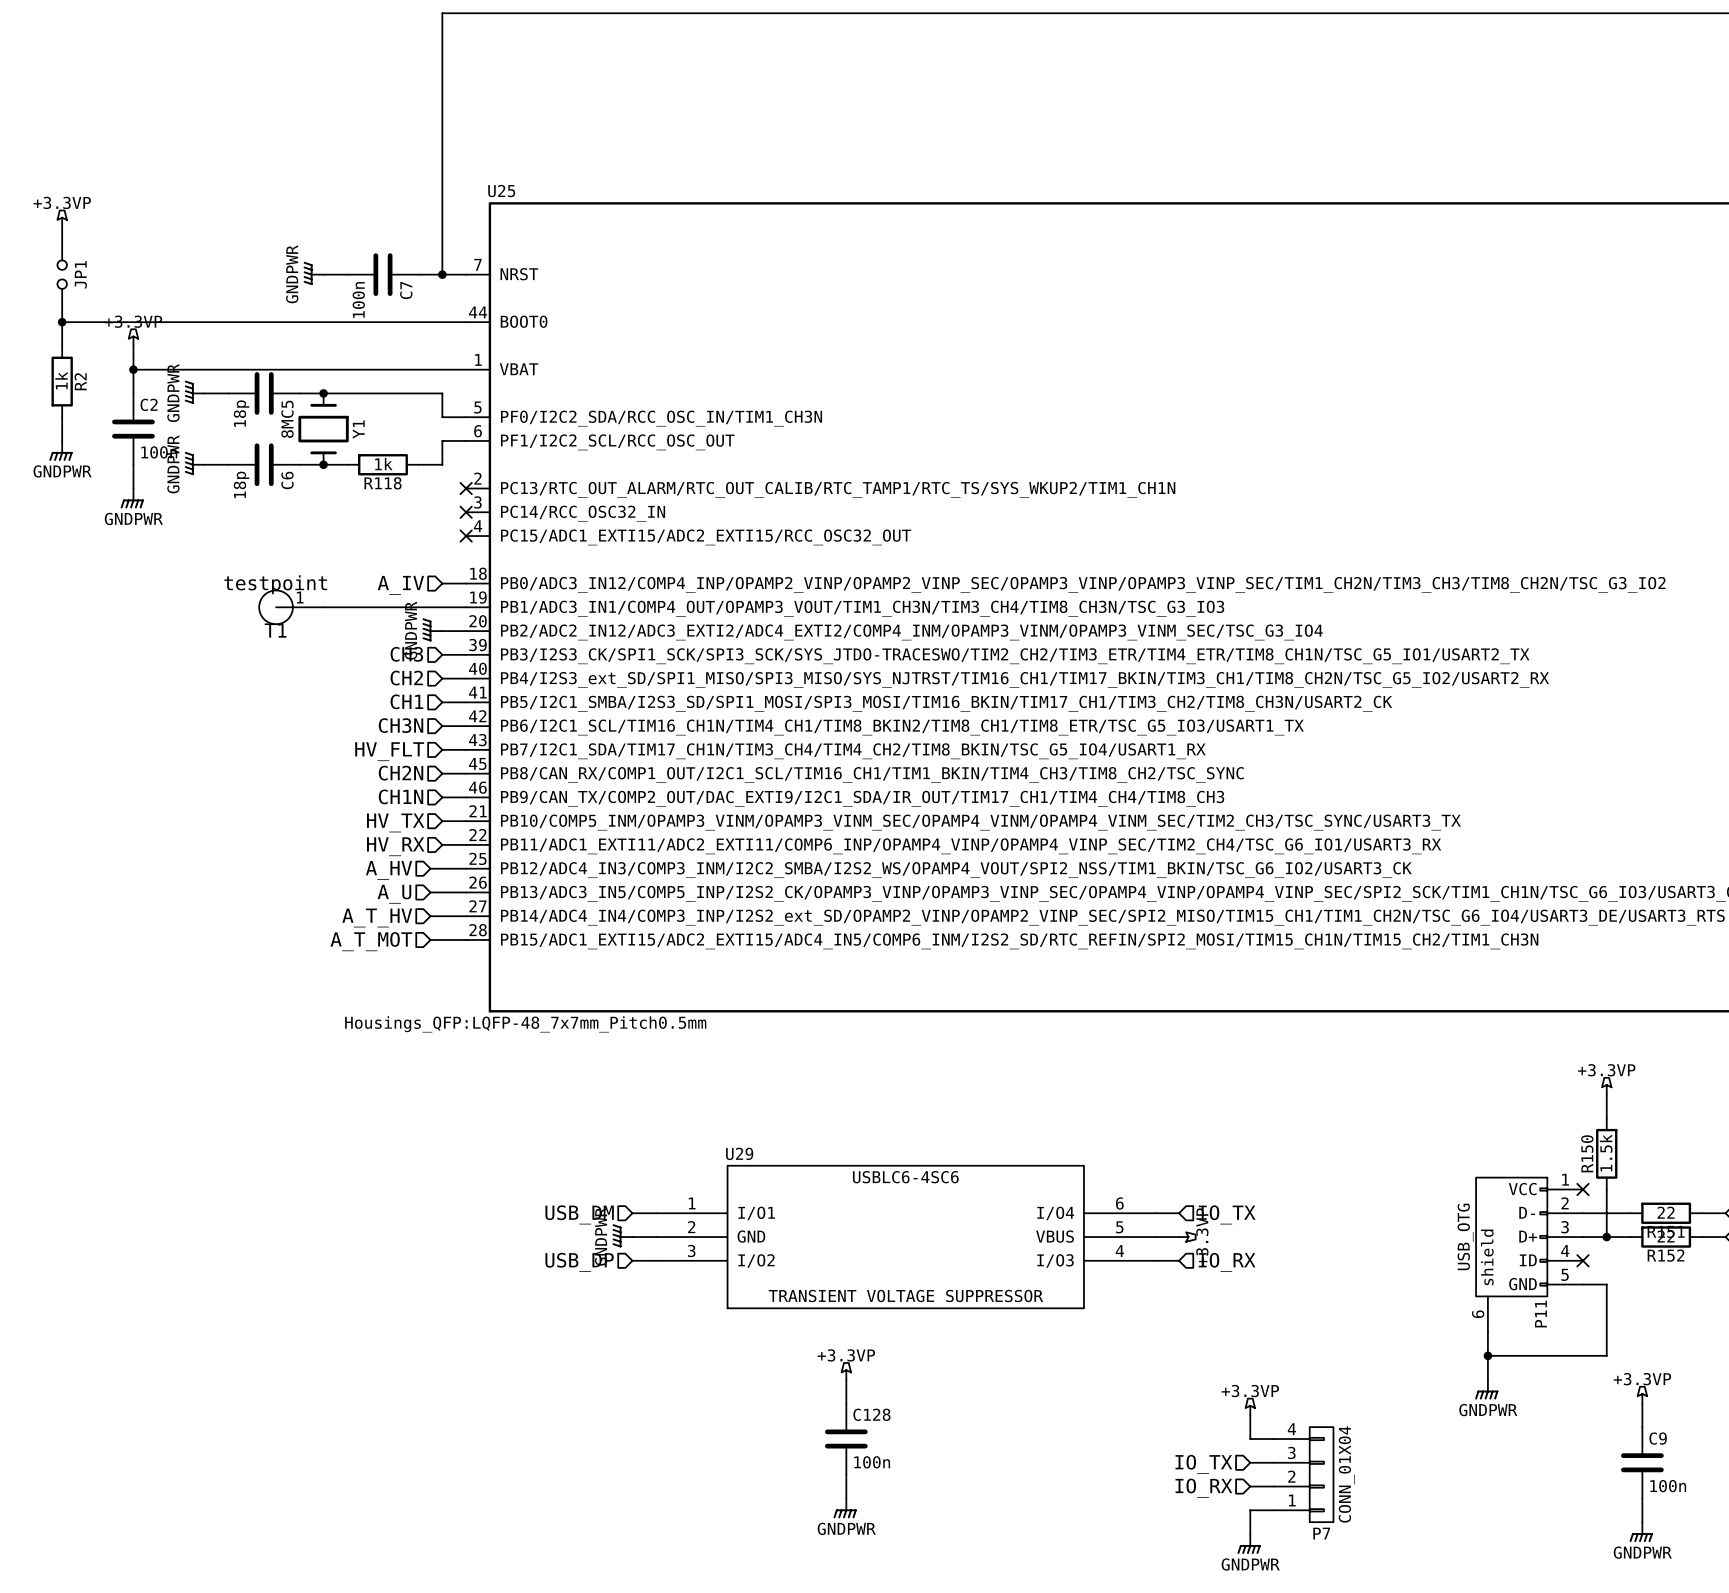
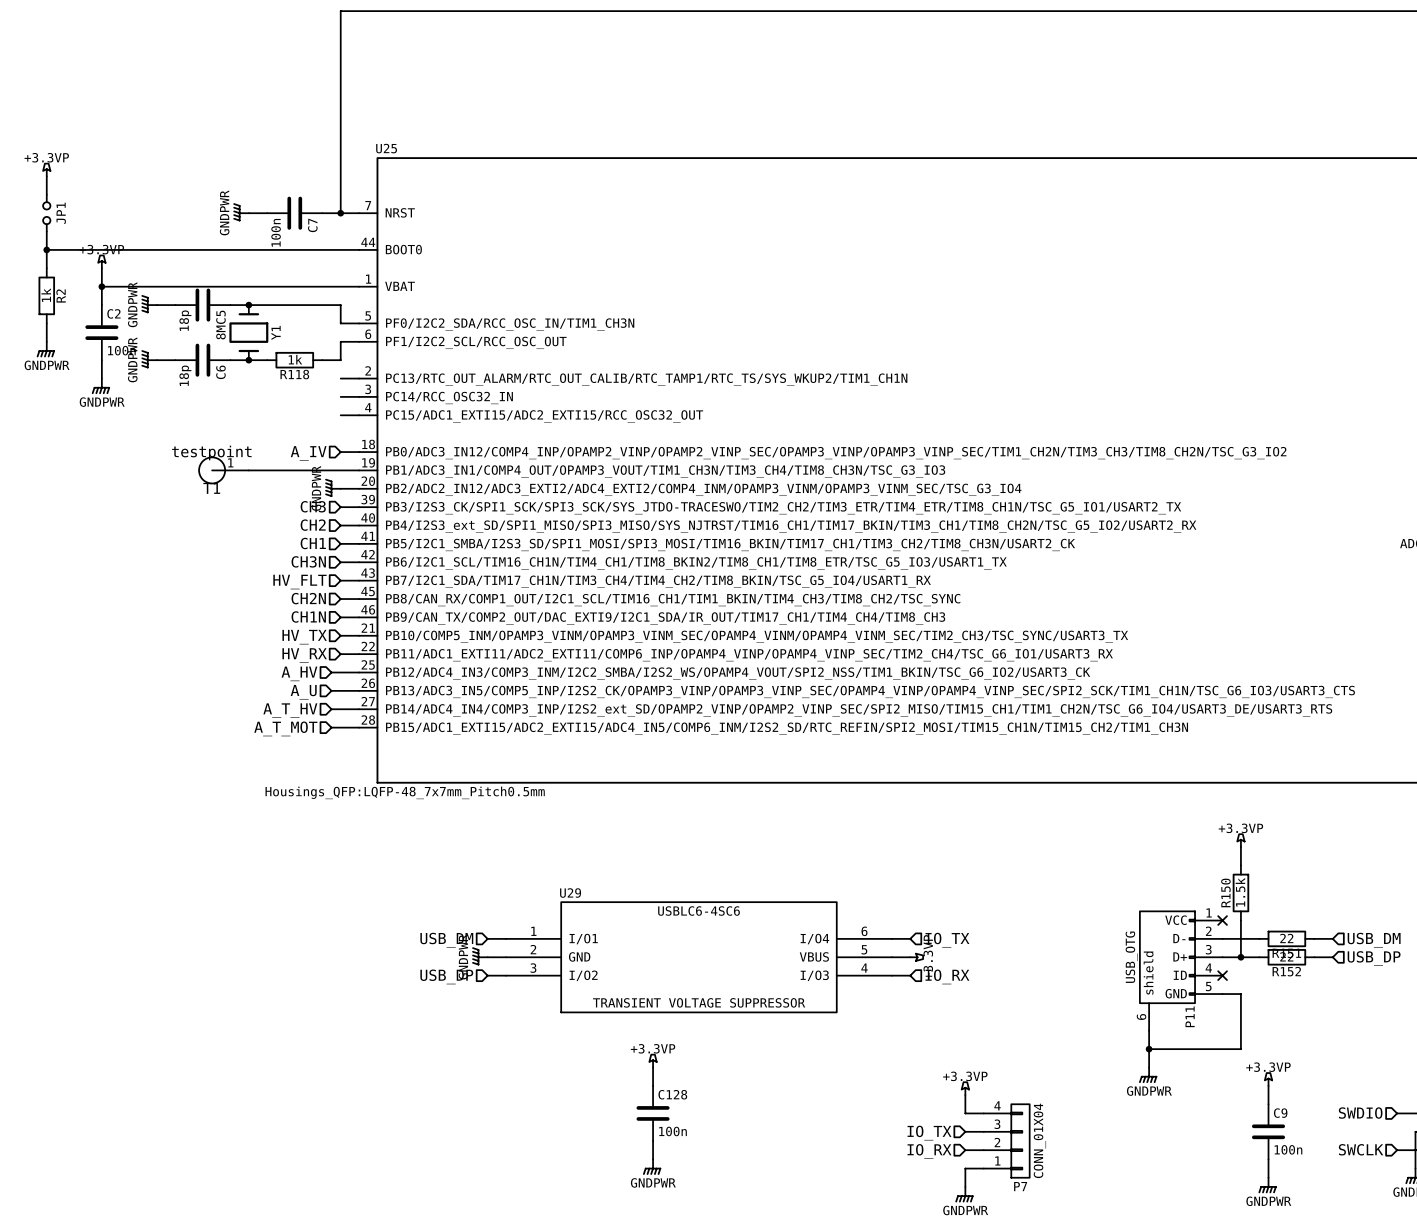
wire: none -> (340, 378) (359, 378)
no-connect mark: (466, 488) -> none
wire: none -> (340, 396) (359, 396)
no-connect mark: (466, 512) -> none
wire: none -> (340, 415) (359, 415)
no-connect mark: (466, 536) -> none

